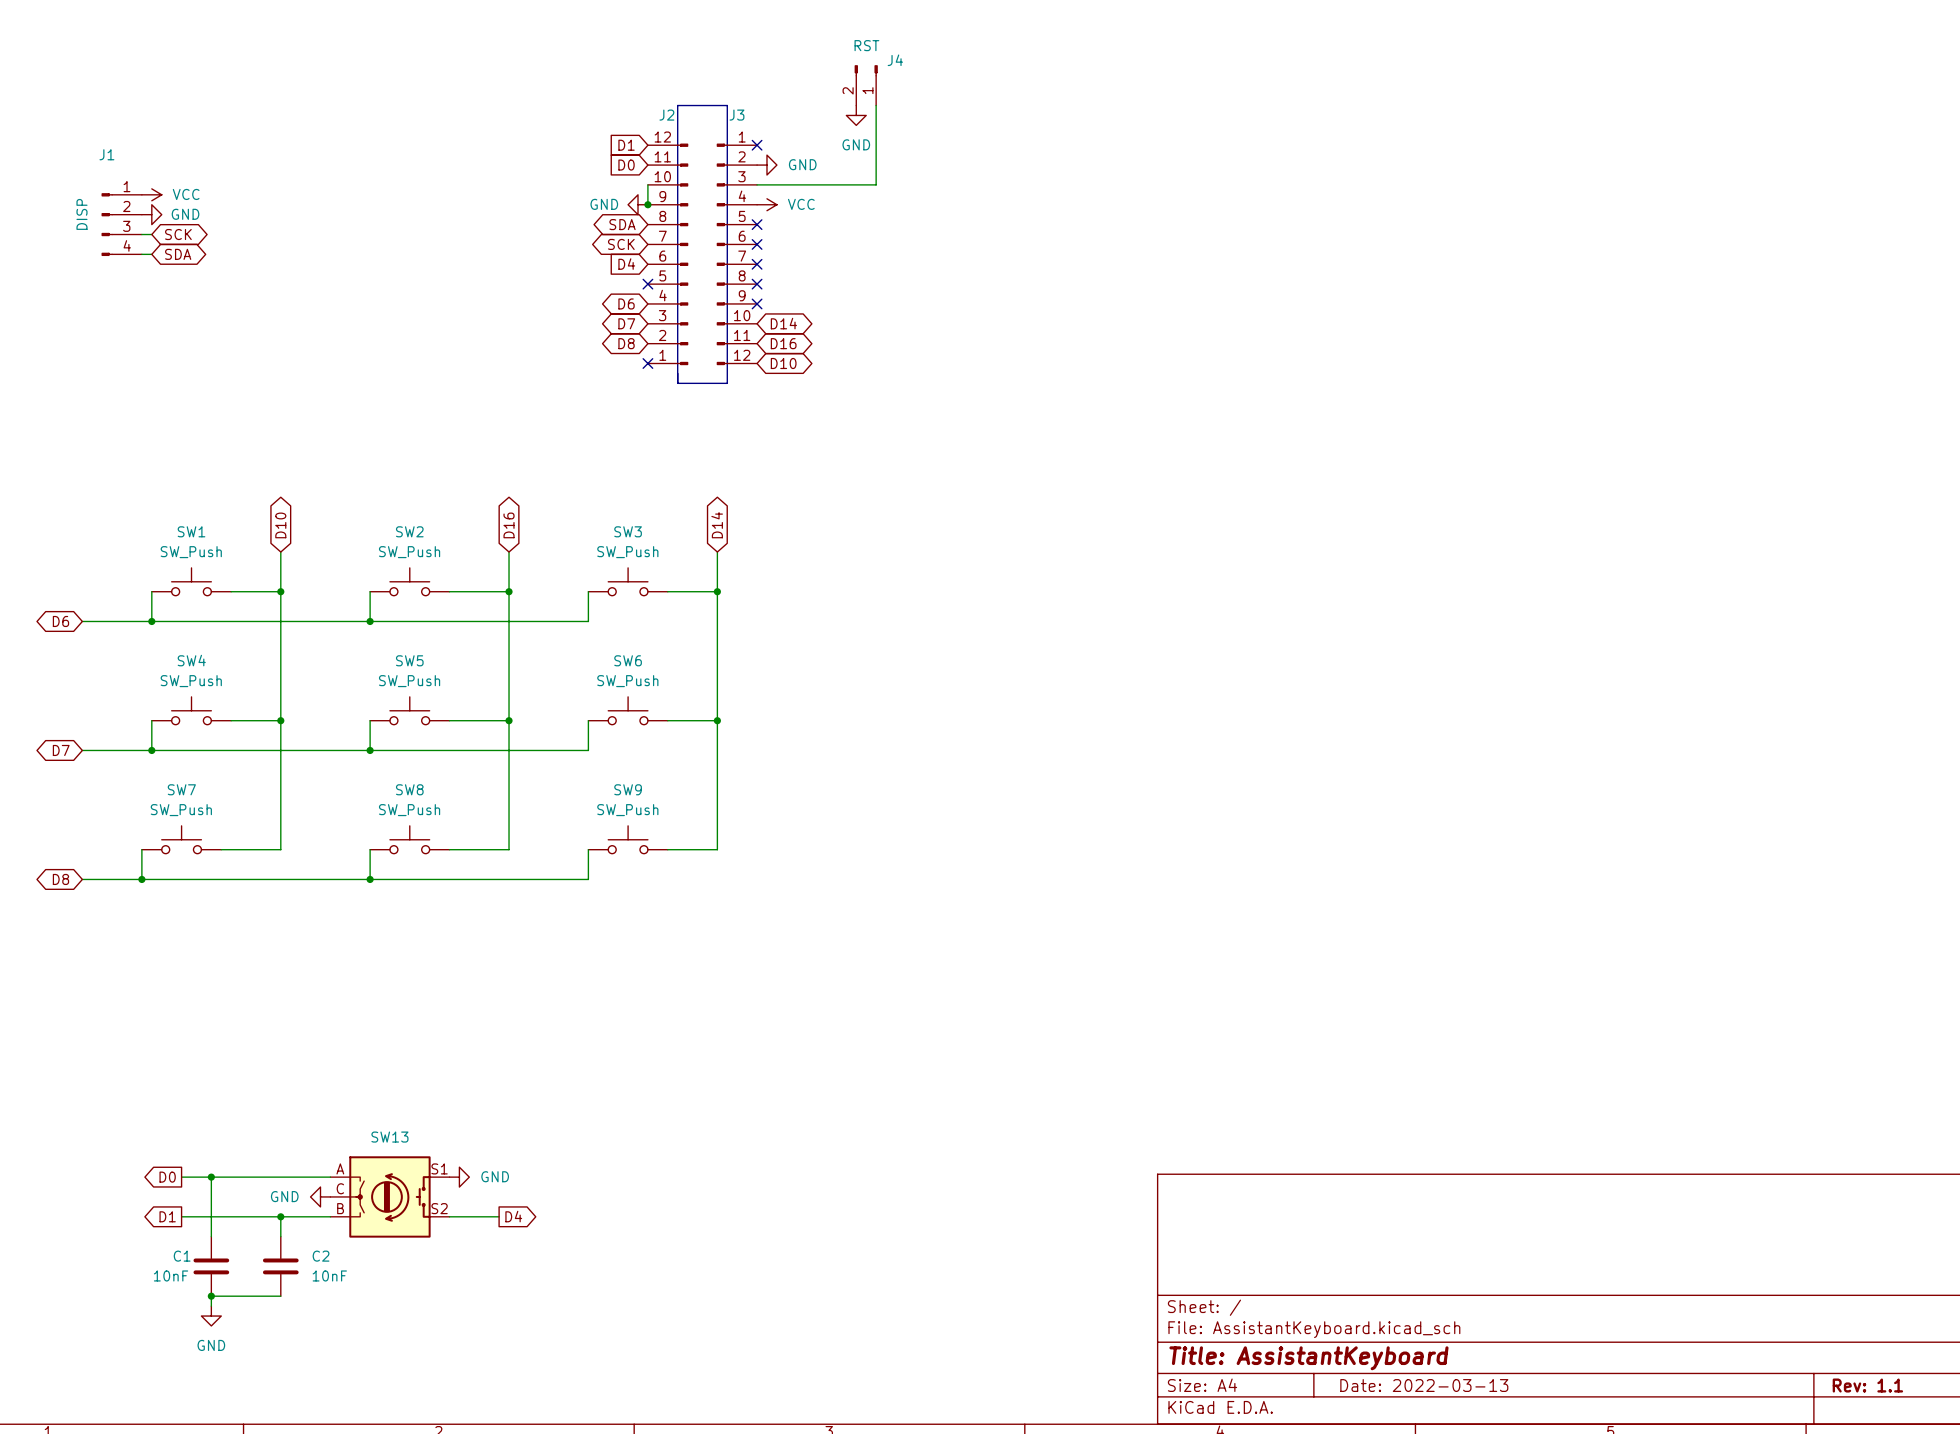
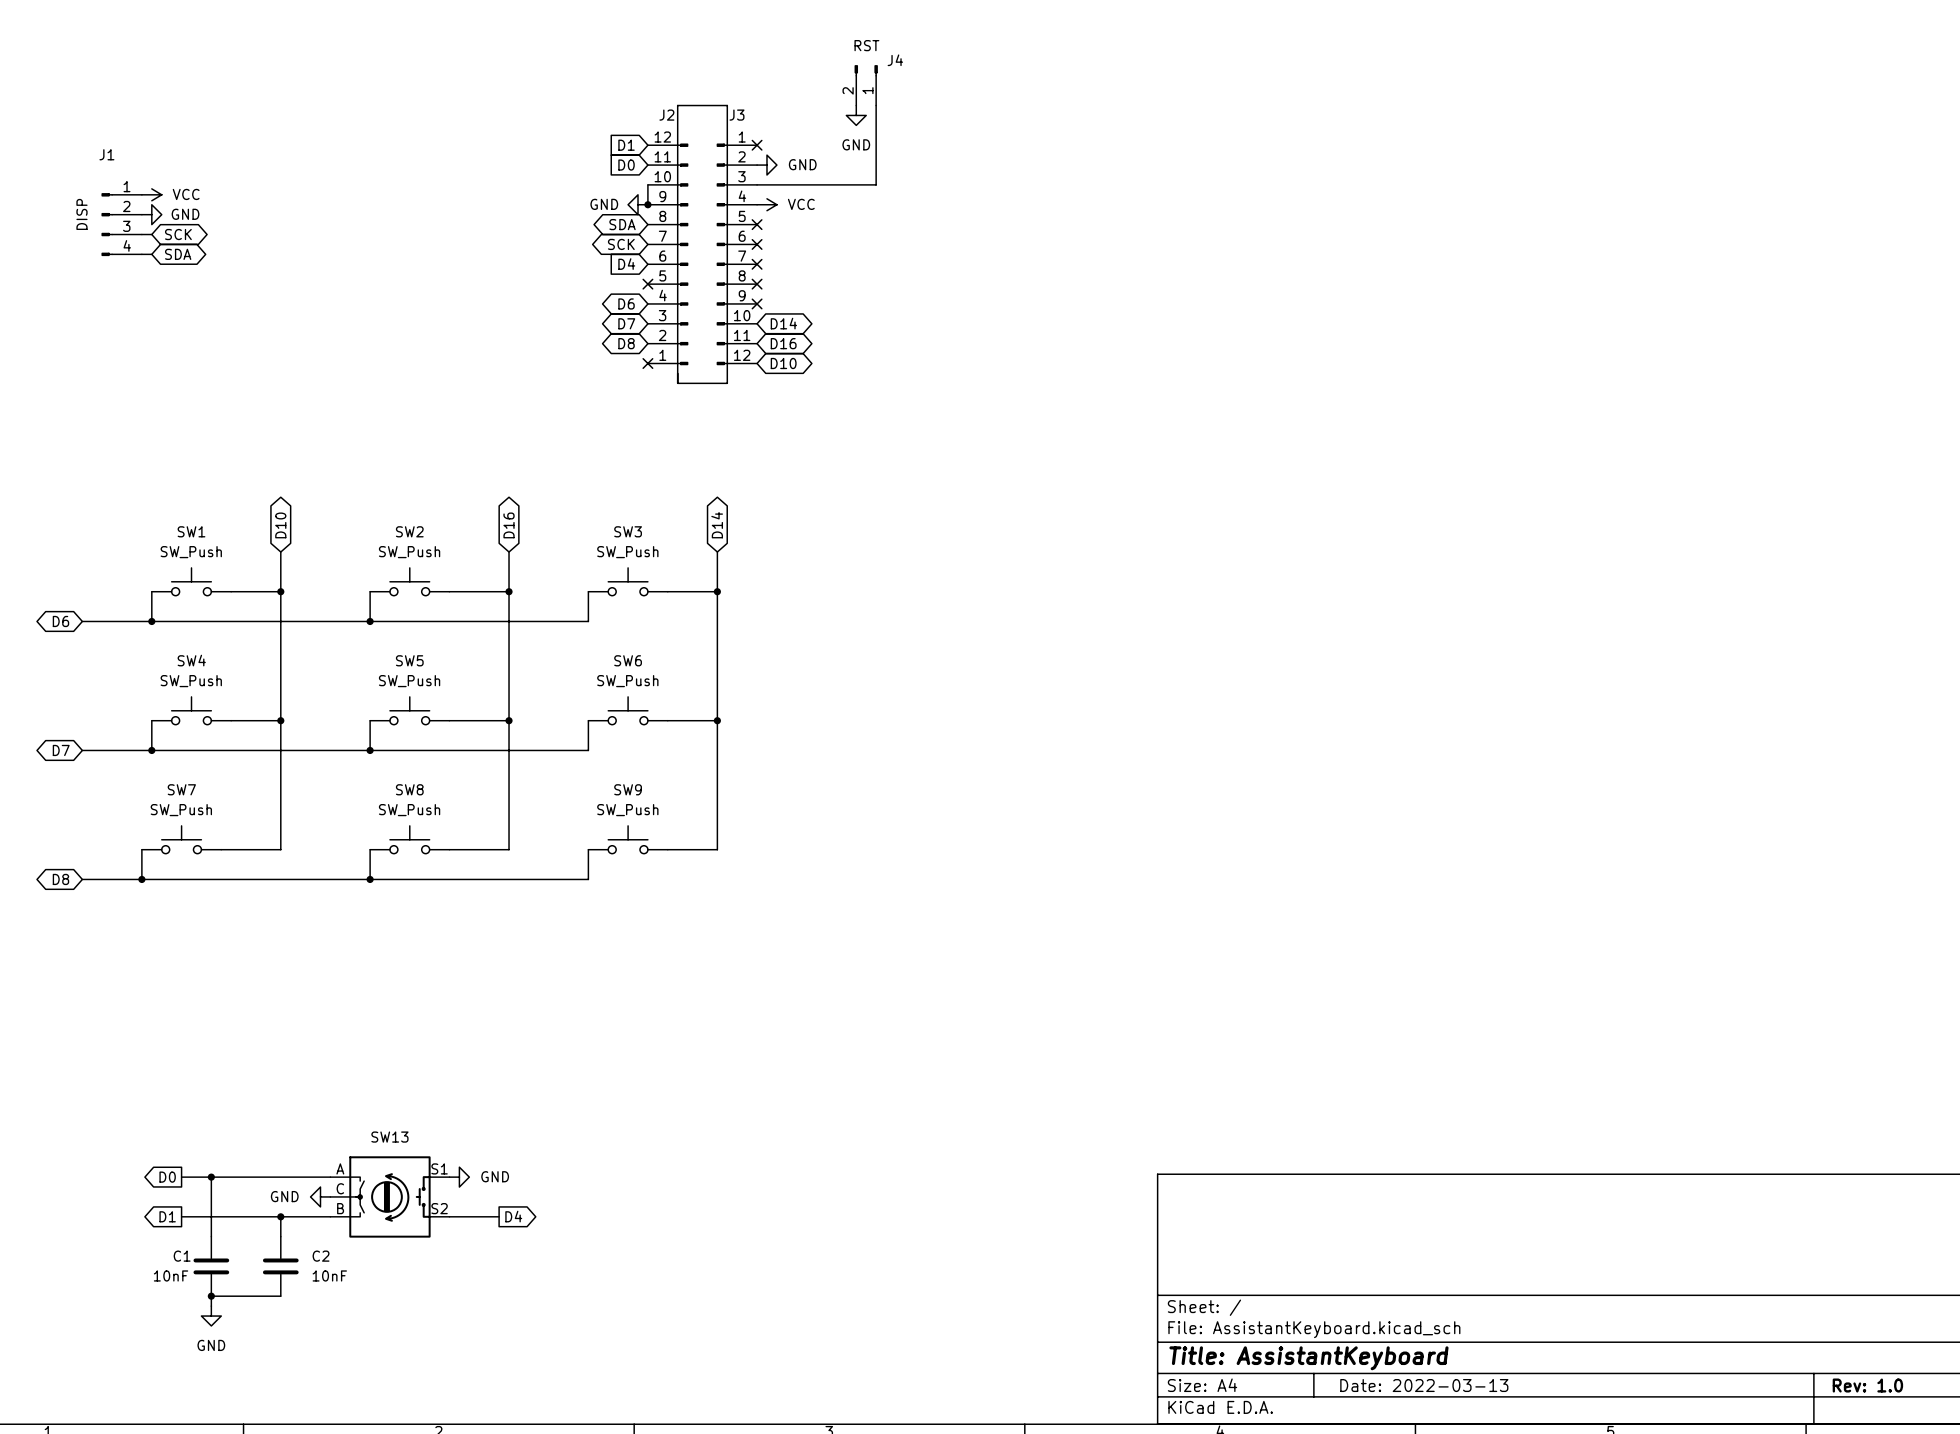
title block: Rev: 1.1 (1867, 1385) -> Rev: 1.0 (1867, 1385)

